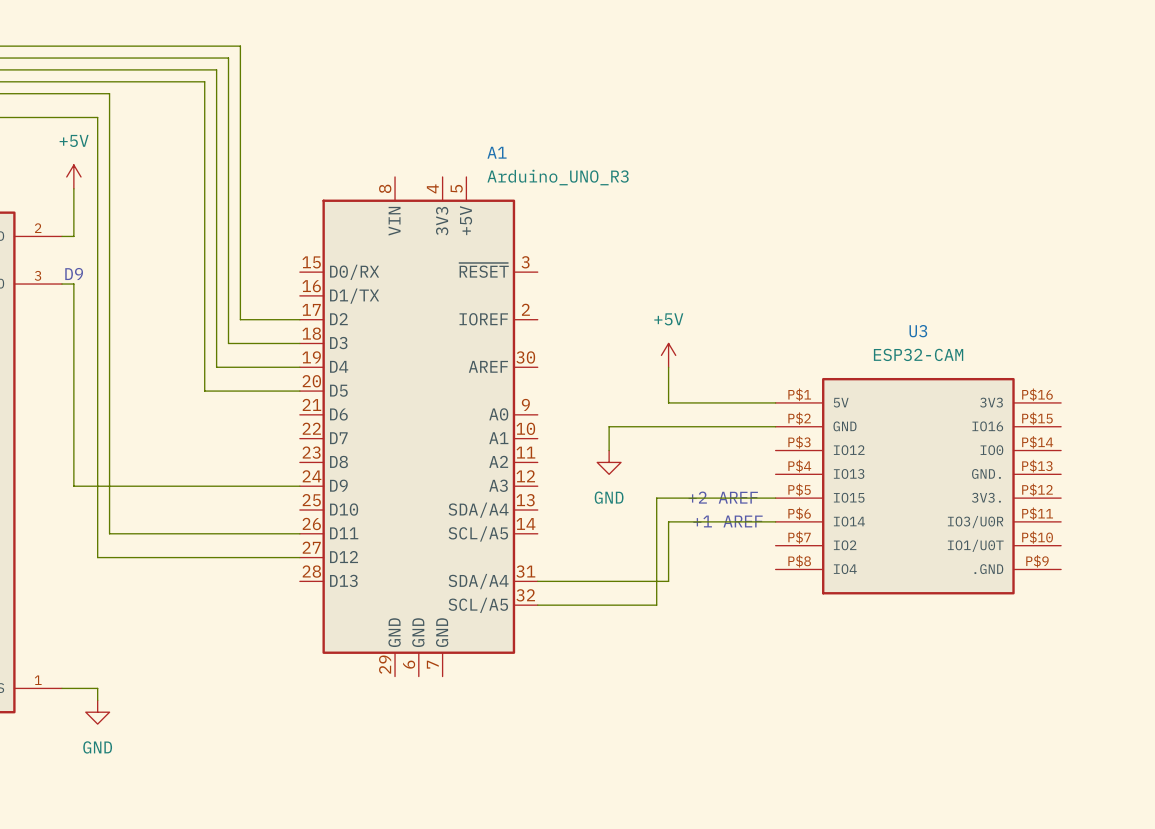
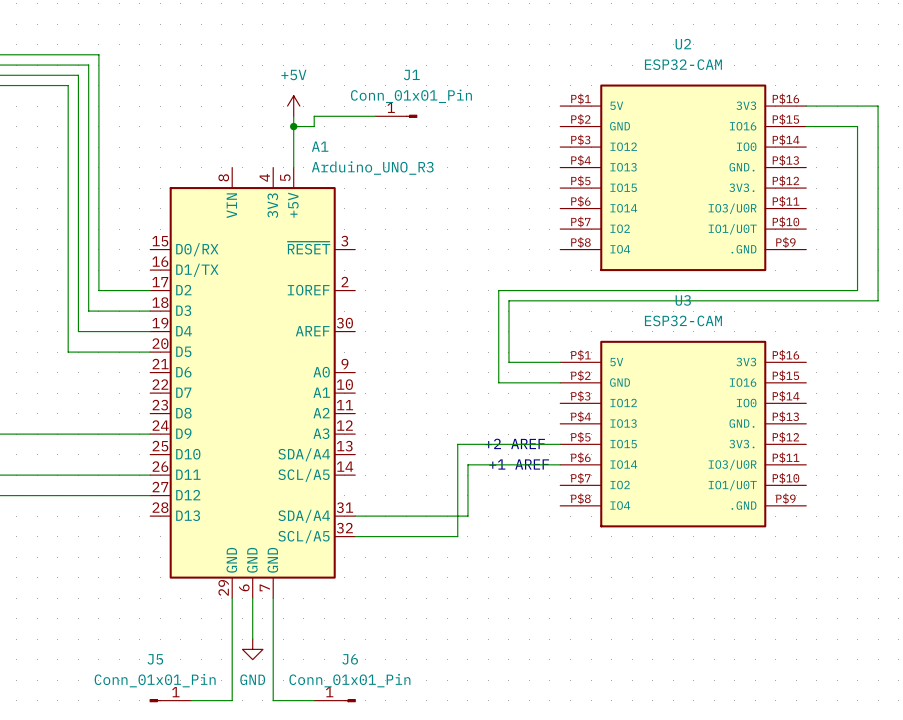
power symbol: none -> +5V (293, 106)
wire: none -> (293, 116) (293, 167)
wire: none -> (375, 116) (314, 116) (314, 126) (293, 126)
J1: none -> Conn_01x01_Pin (396, 116)
junction: none -> (293, 126)
U2: none -> ESP32-CAM (683, 177)
power symbol: +5V (668, 355) -> none
wire: (668, 367) (668, 402) (716, 402) -> (806, 106) (878, 106) (878, 300) (508, 300) (508, 362)
wire: (704, 426) (609, 426) (609, 450) -> (498, 382) (498, 290) (857, 290) (857, 126) (806, 126)
power symbol: GND (609, 462) -> none
wire: none -> (232, 598) (232, 700) (191, 700)
wire: none -> (252, 598) (252, 639)
wire: none -> (273, 598) (273, 700) (314, 700)
power symbol: none -> GND (252, 649)
J5: none -> Conn_01x01_Pin (170, 700)
J6: none -> Conn_01x01_Pin (335, 700)

